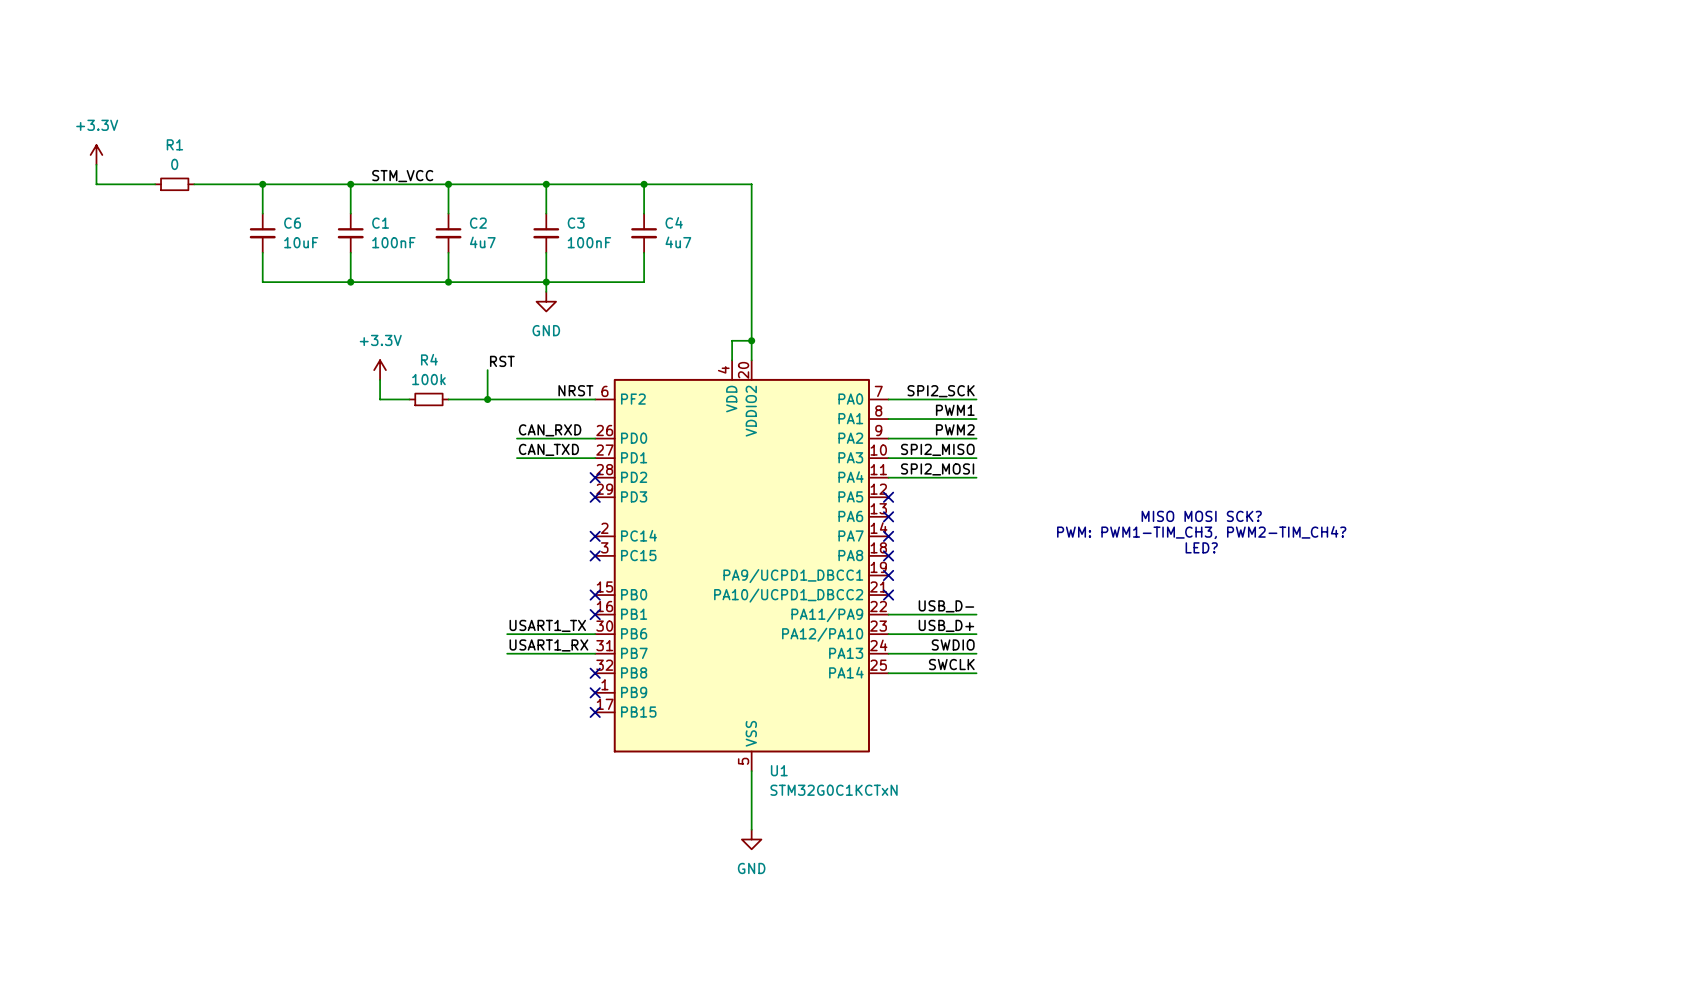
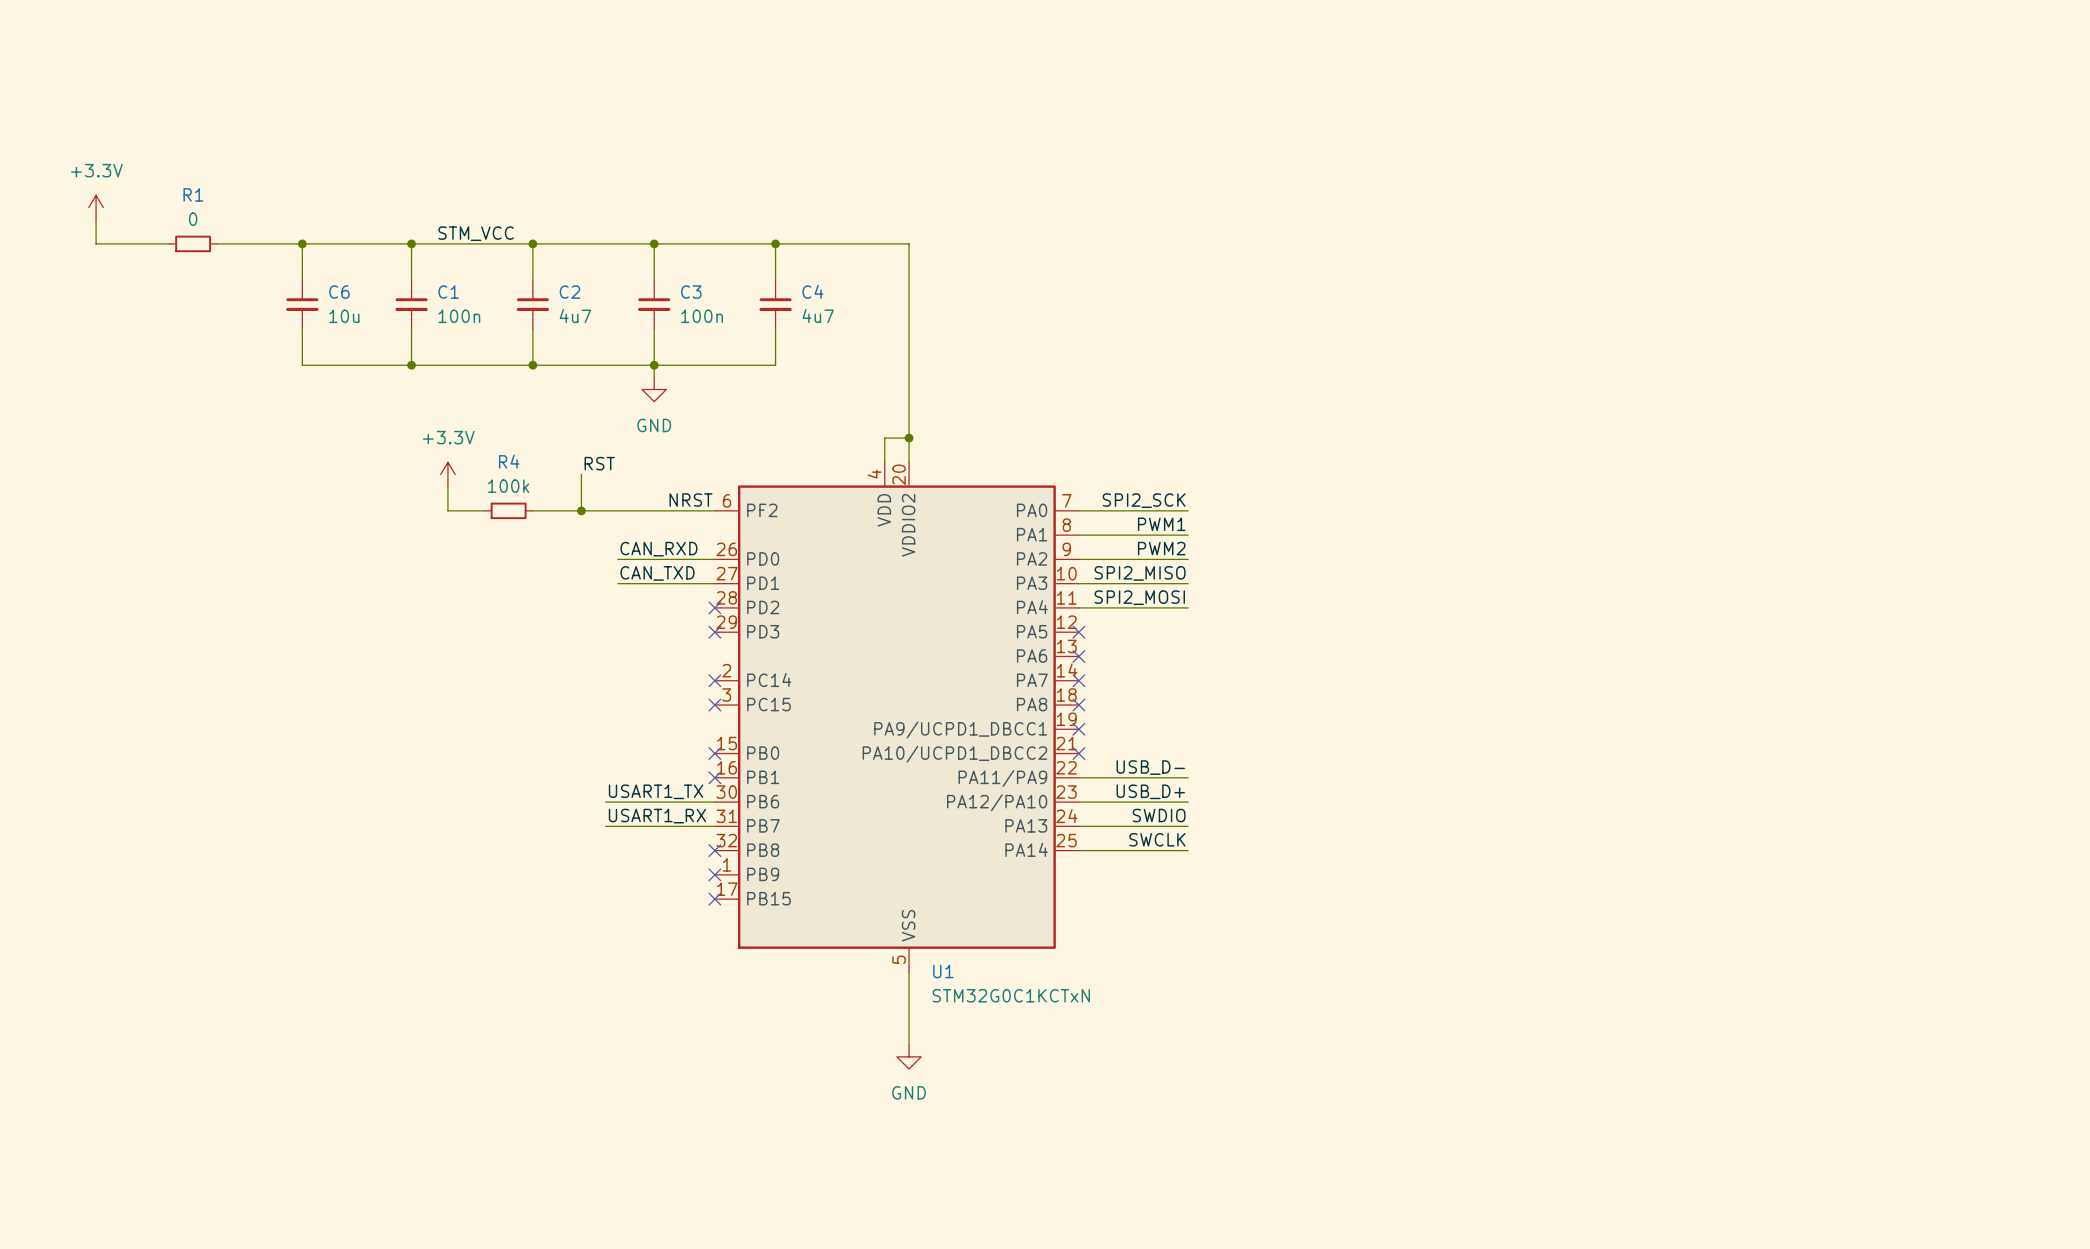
C6 value: 10uF (301, 242) -> 10u (344, 316)
C1 value: 100nF (393, 242) -> 100n (459, 316)
C3 value: 100nF (589, 242) -> 100n (701, 316)
text: MISO MOSI SCK? (1201, 516) -> none
text: PWM: PWM1-TIM_CH3, PWM2-TIM_CH4? (1201, 532) -> none
text: LED? (1201, 547) -> none

